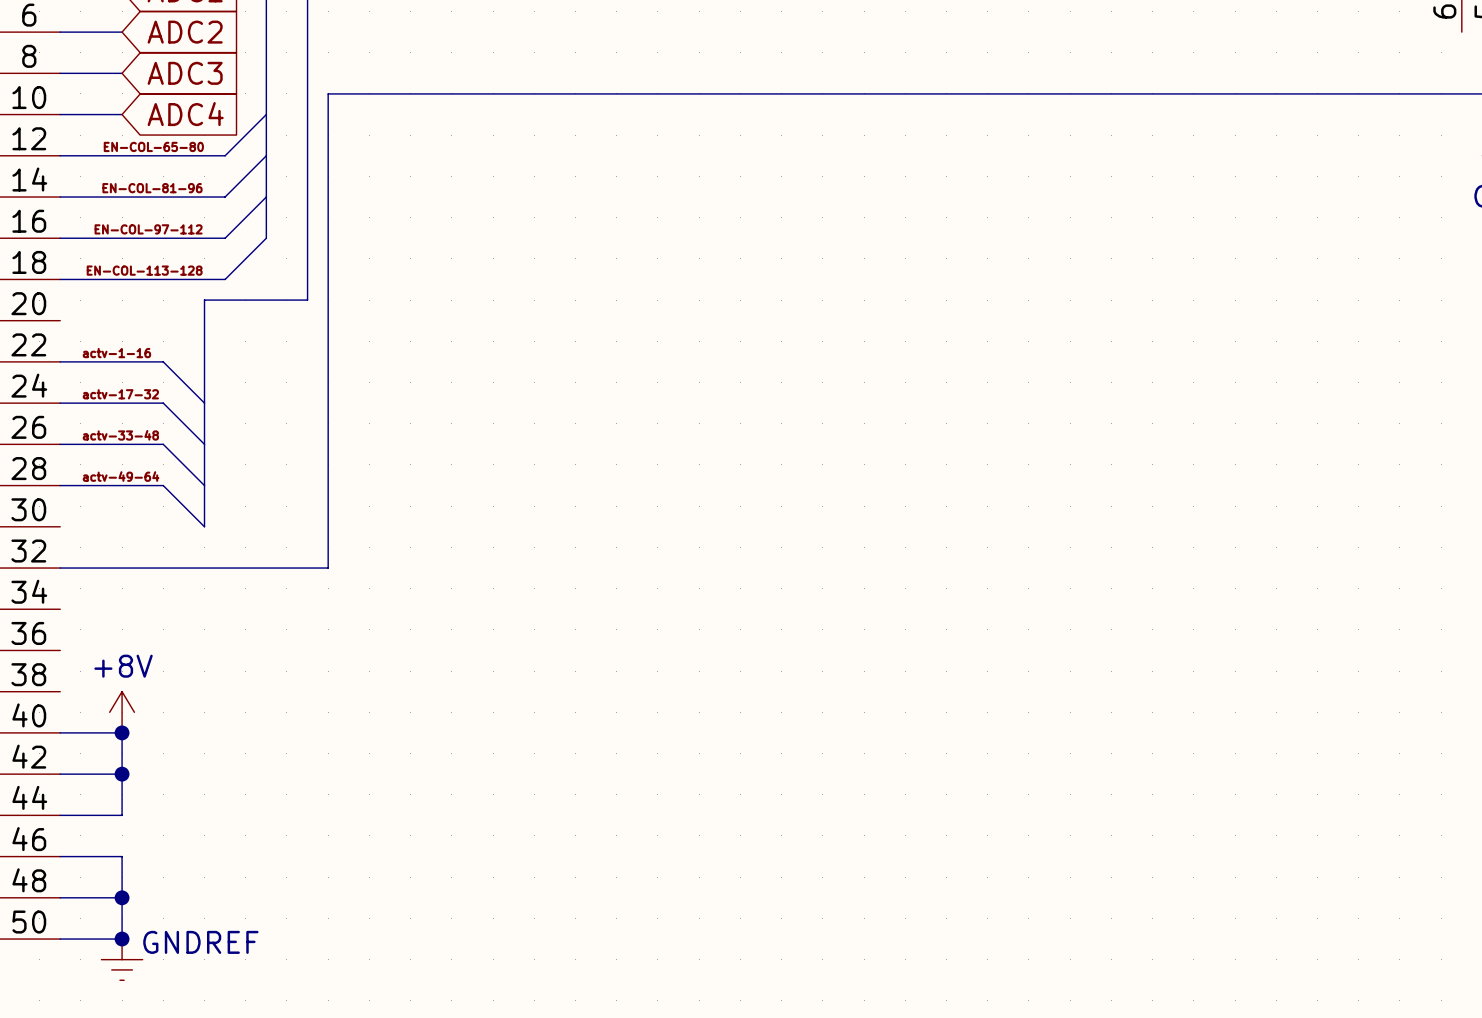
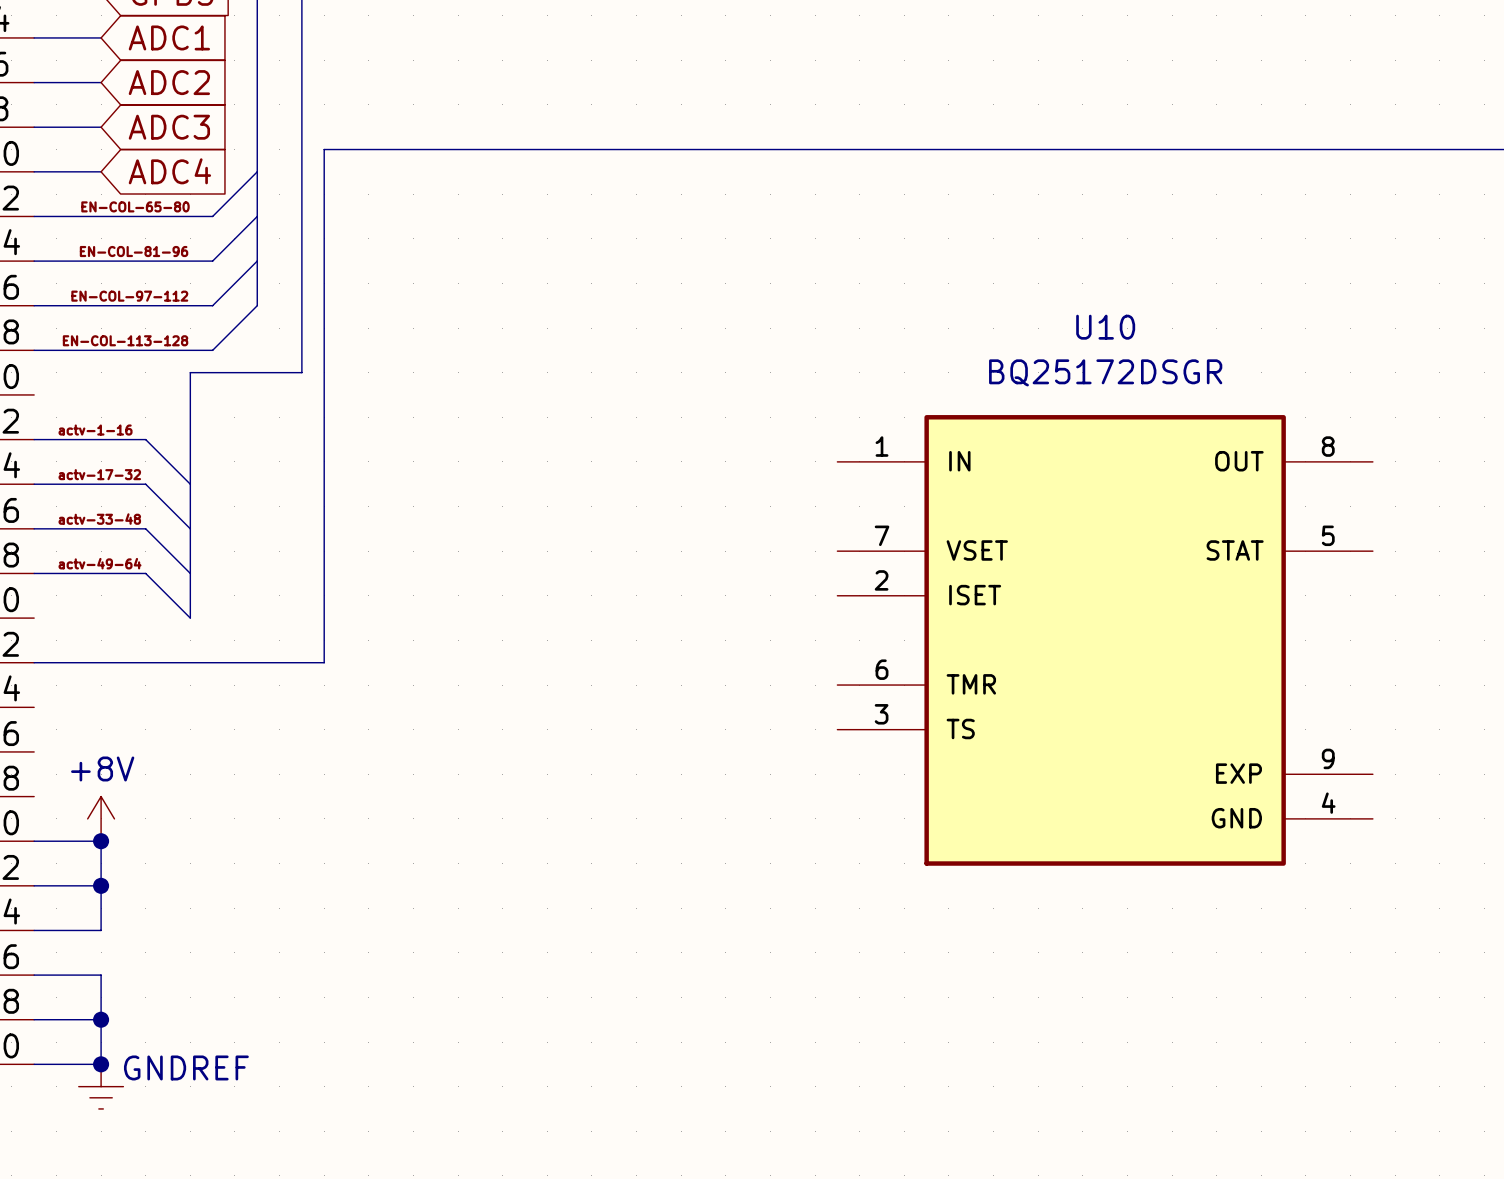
U10: none -> BQ25172DSGR (1105, 640)

